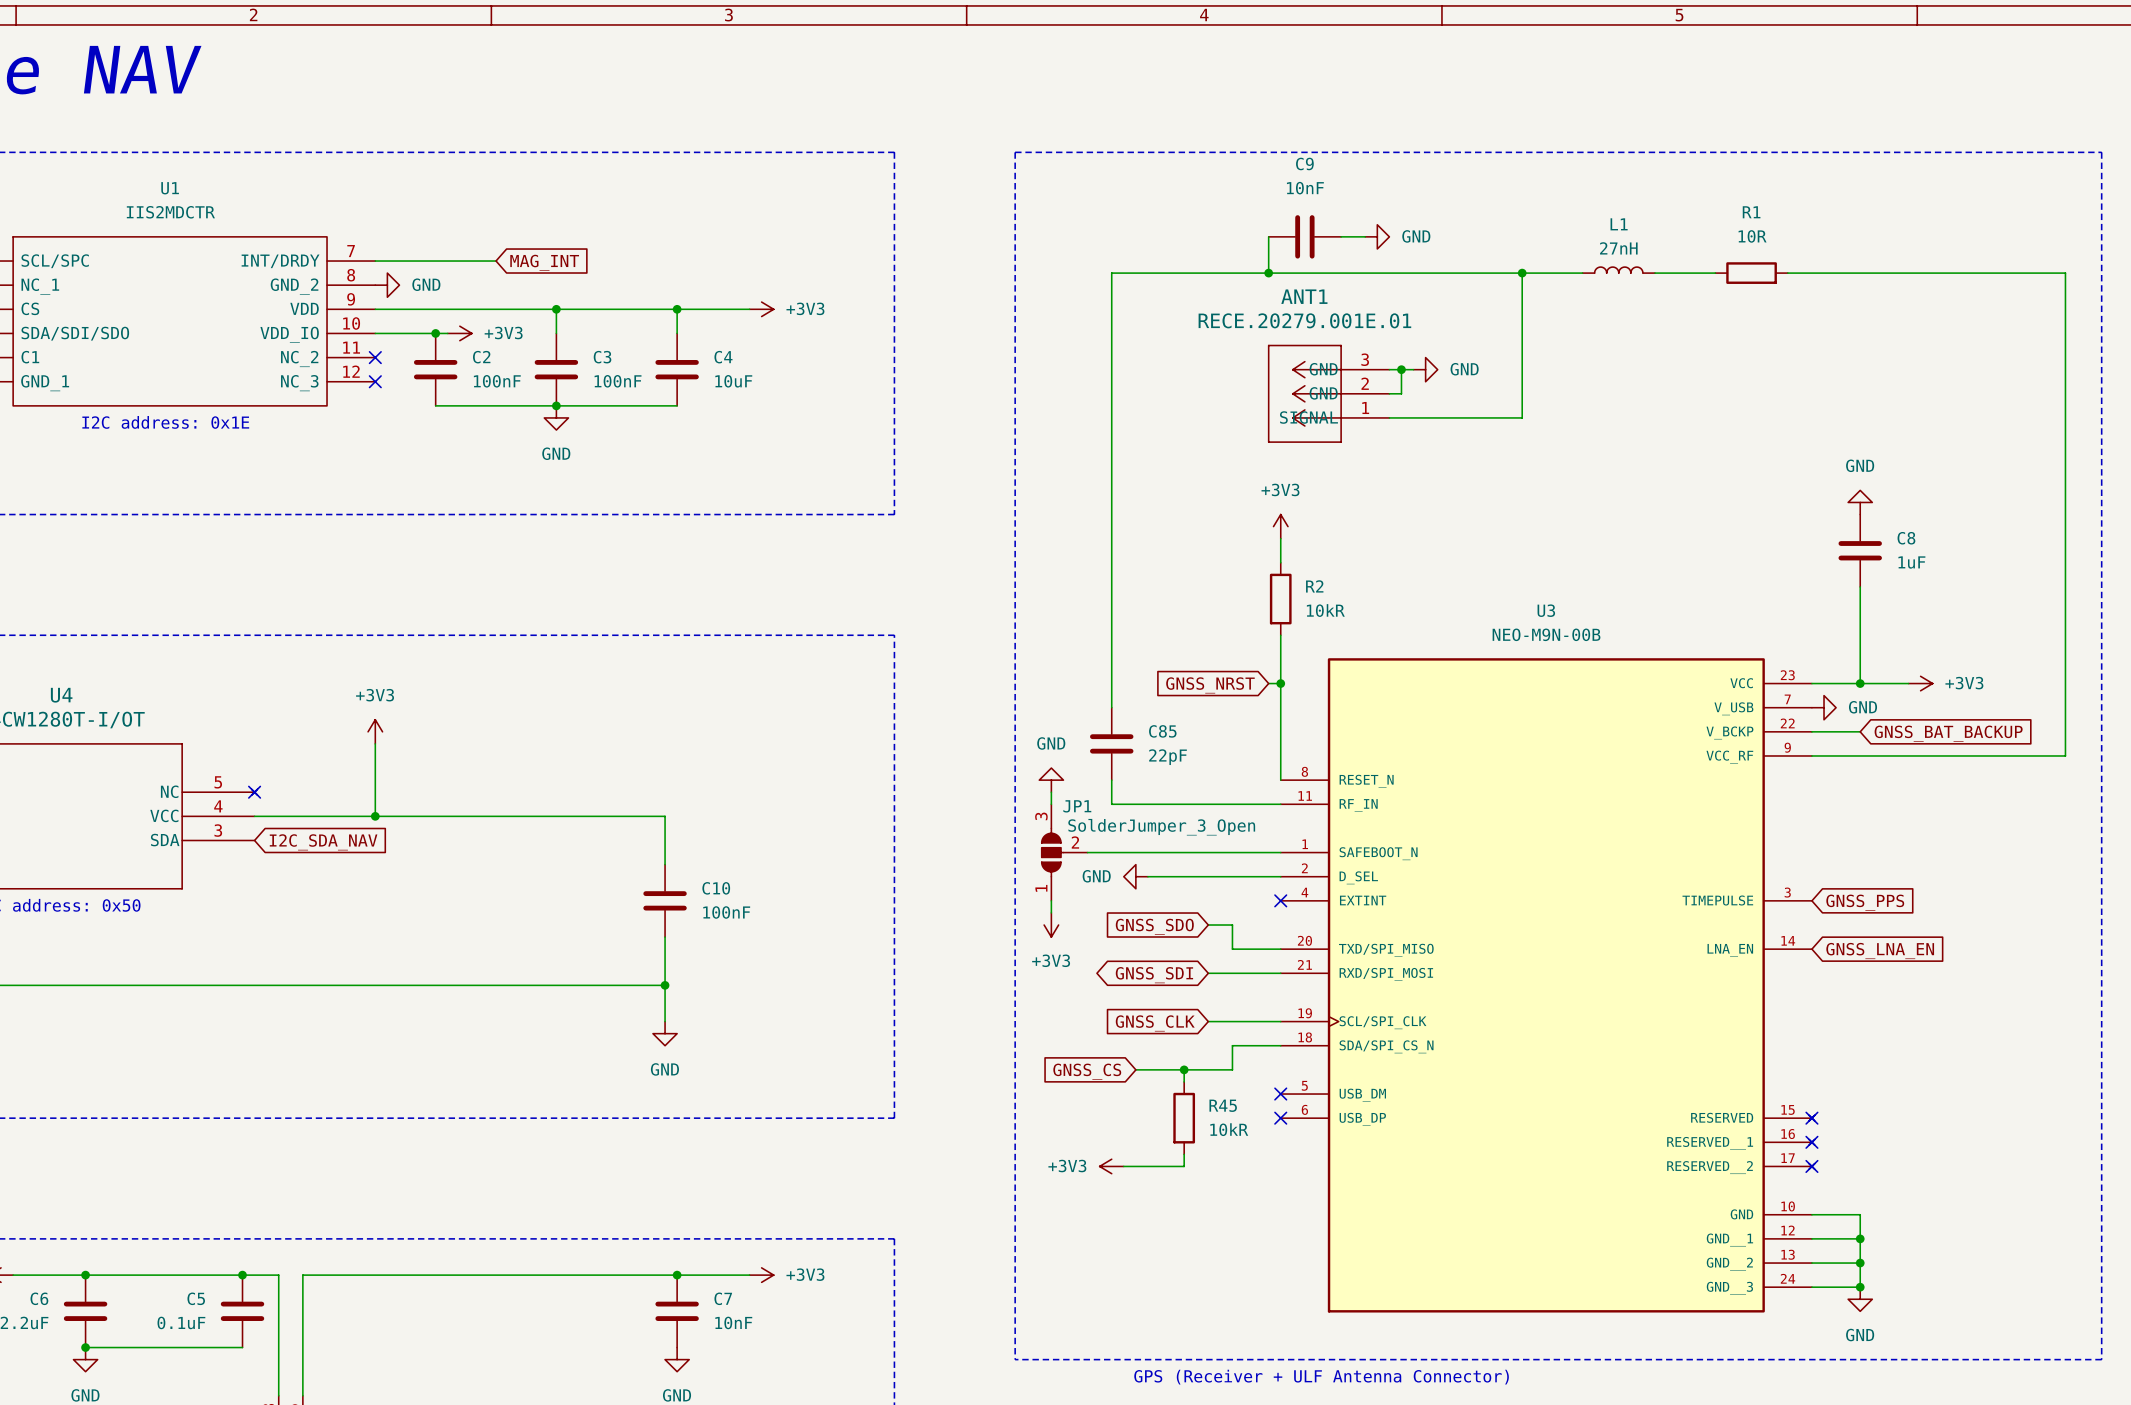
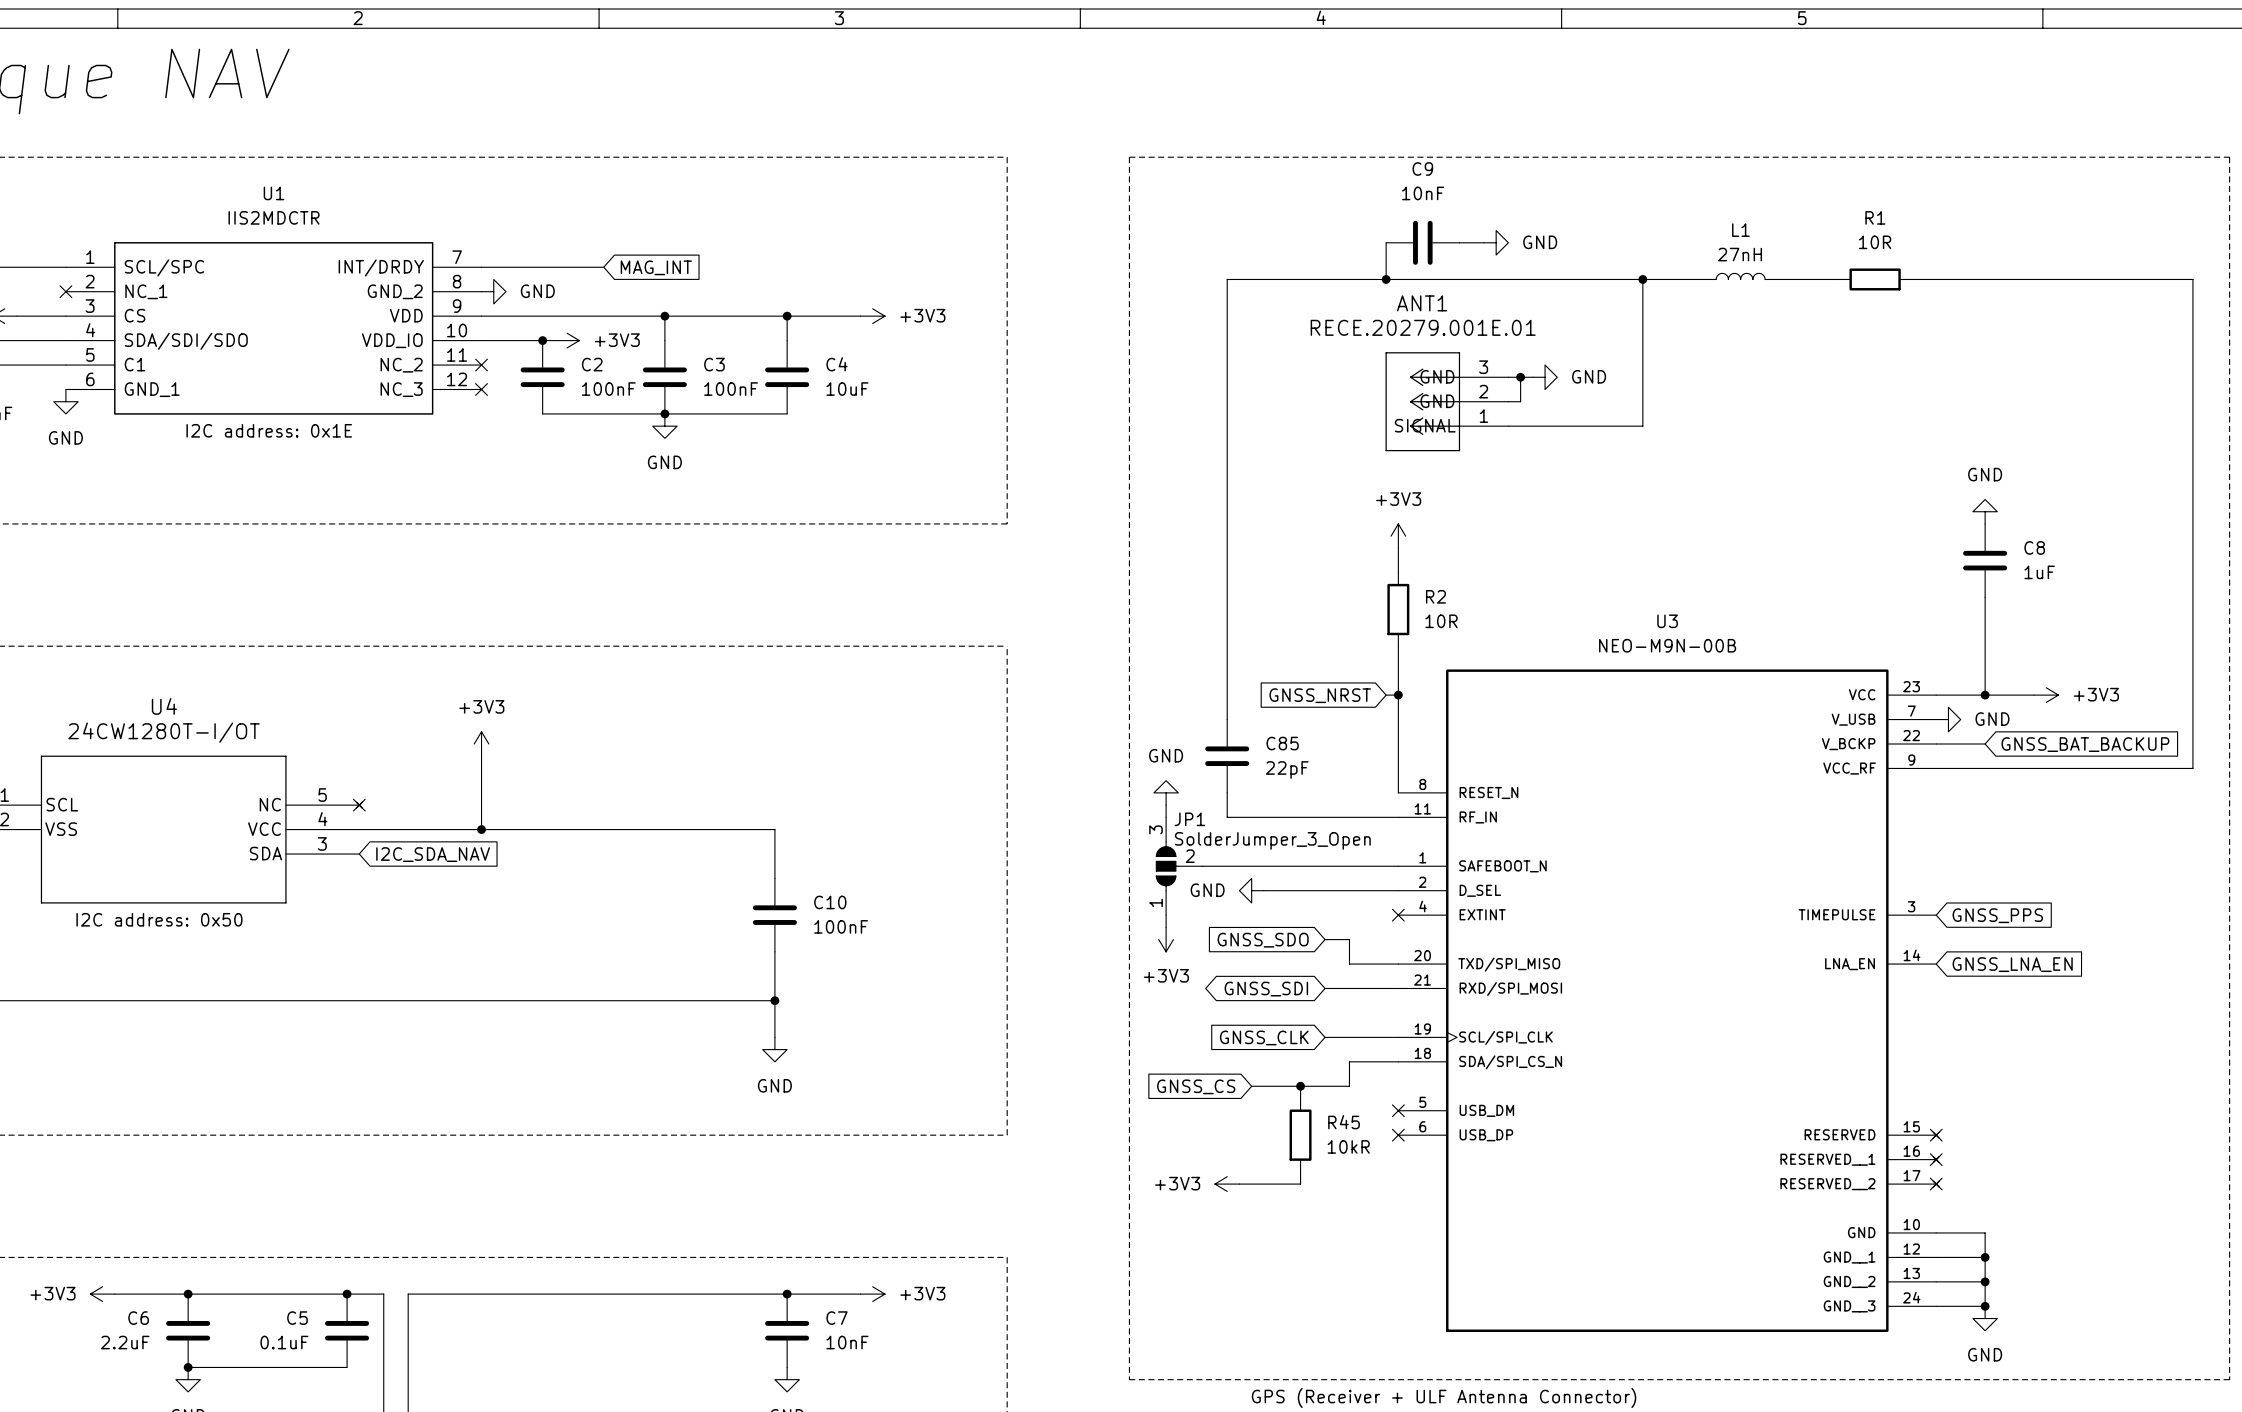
R2 value: 10kR (1325, 610) -> 10R (1441, 621)

